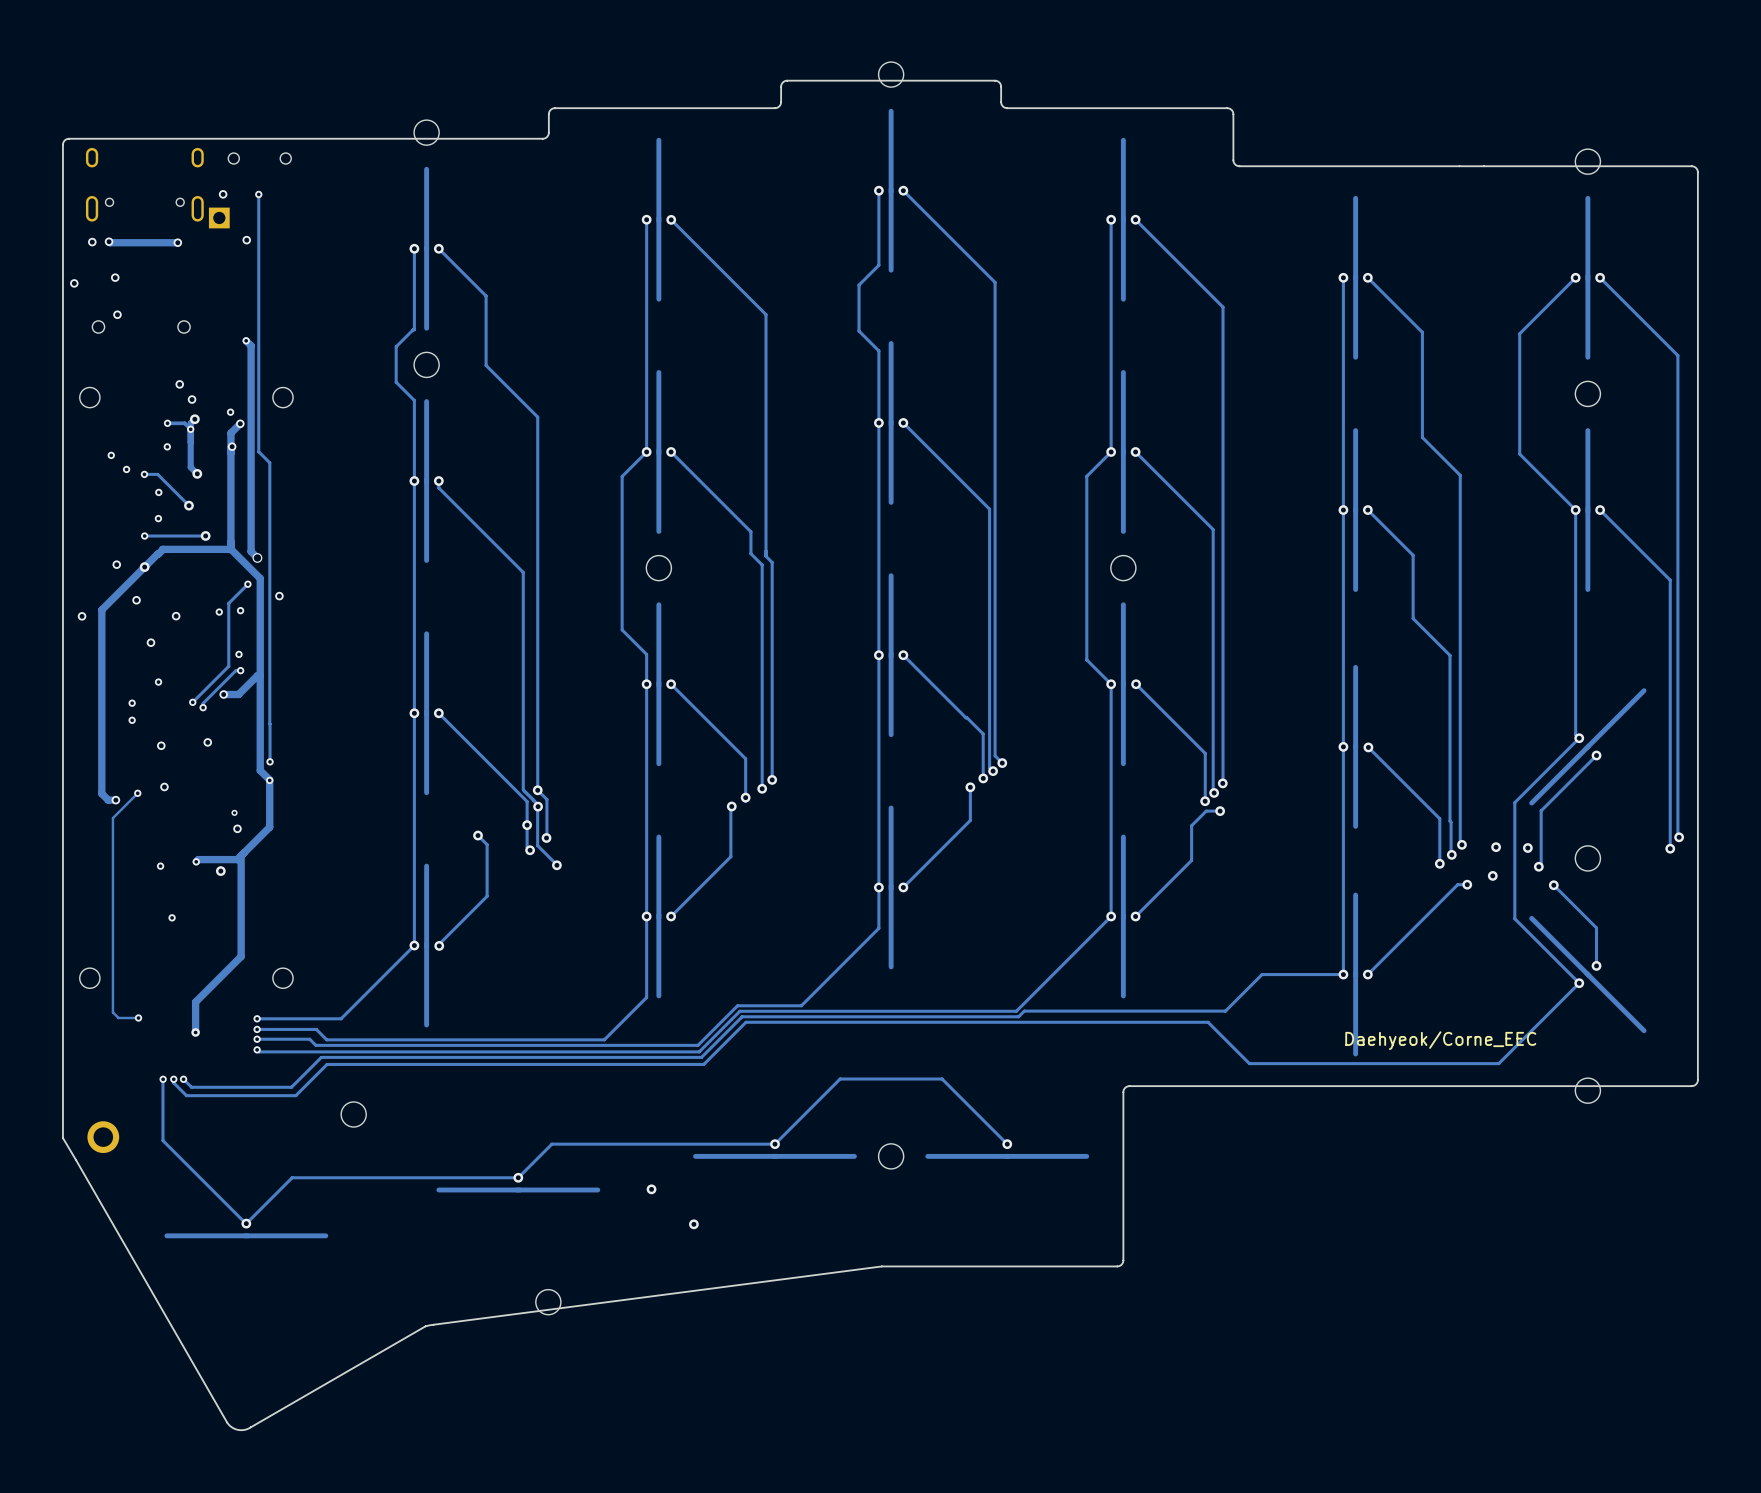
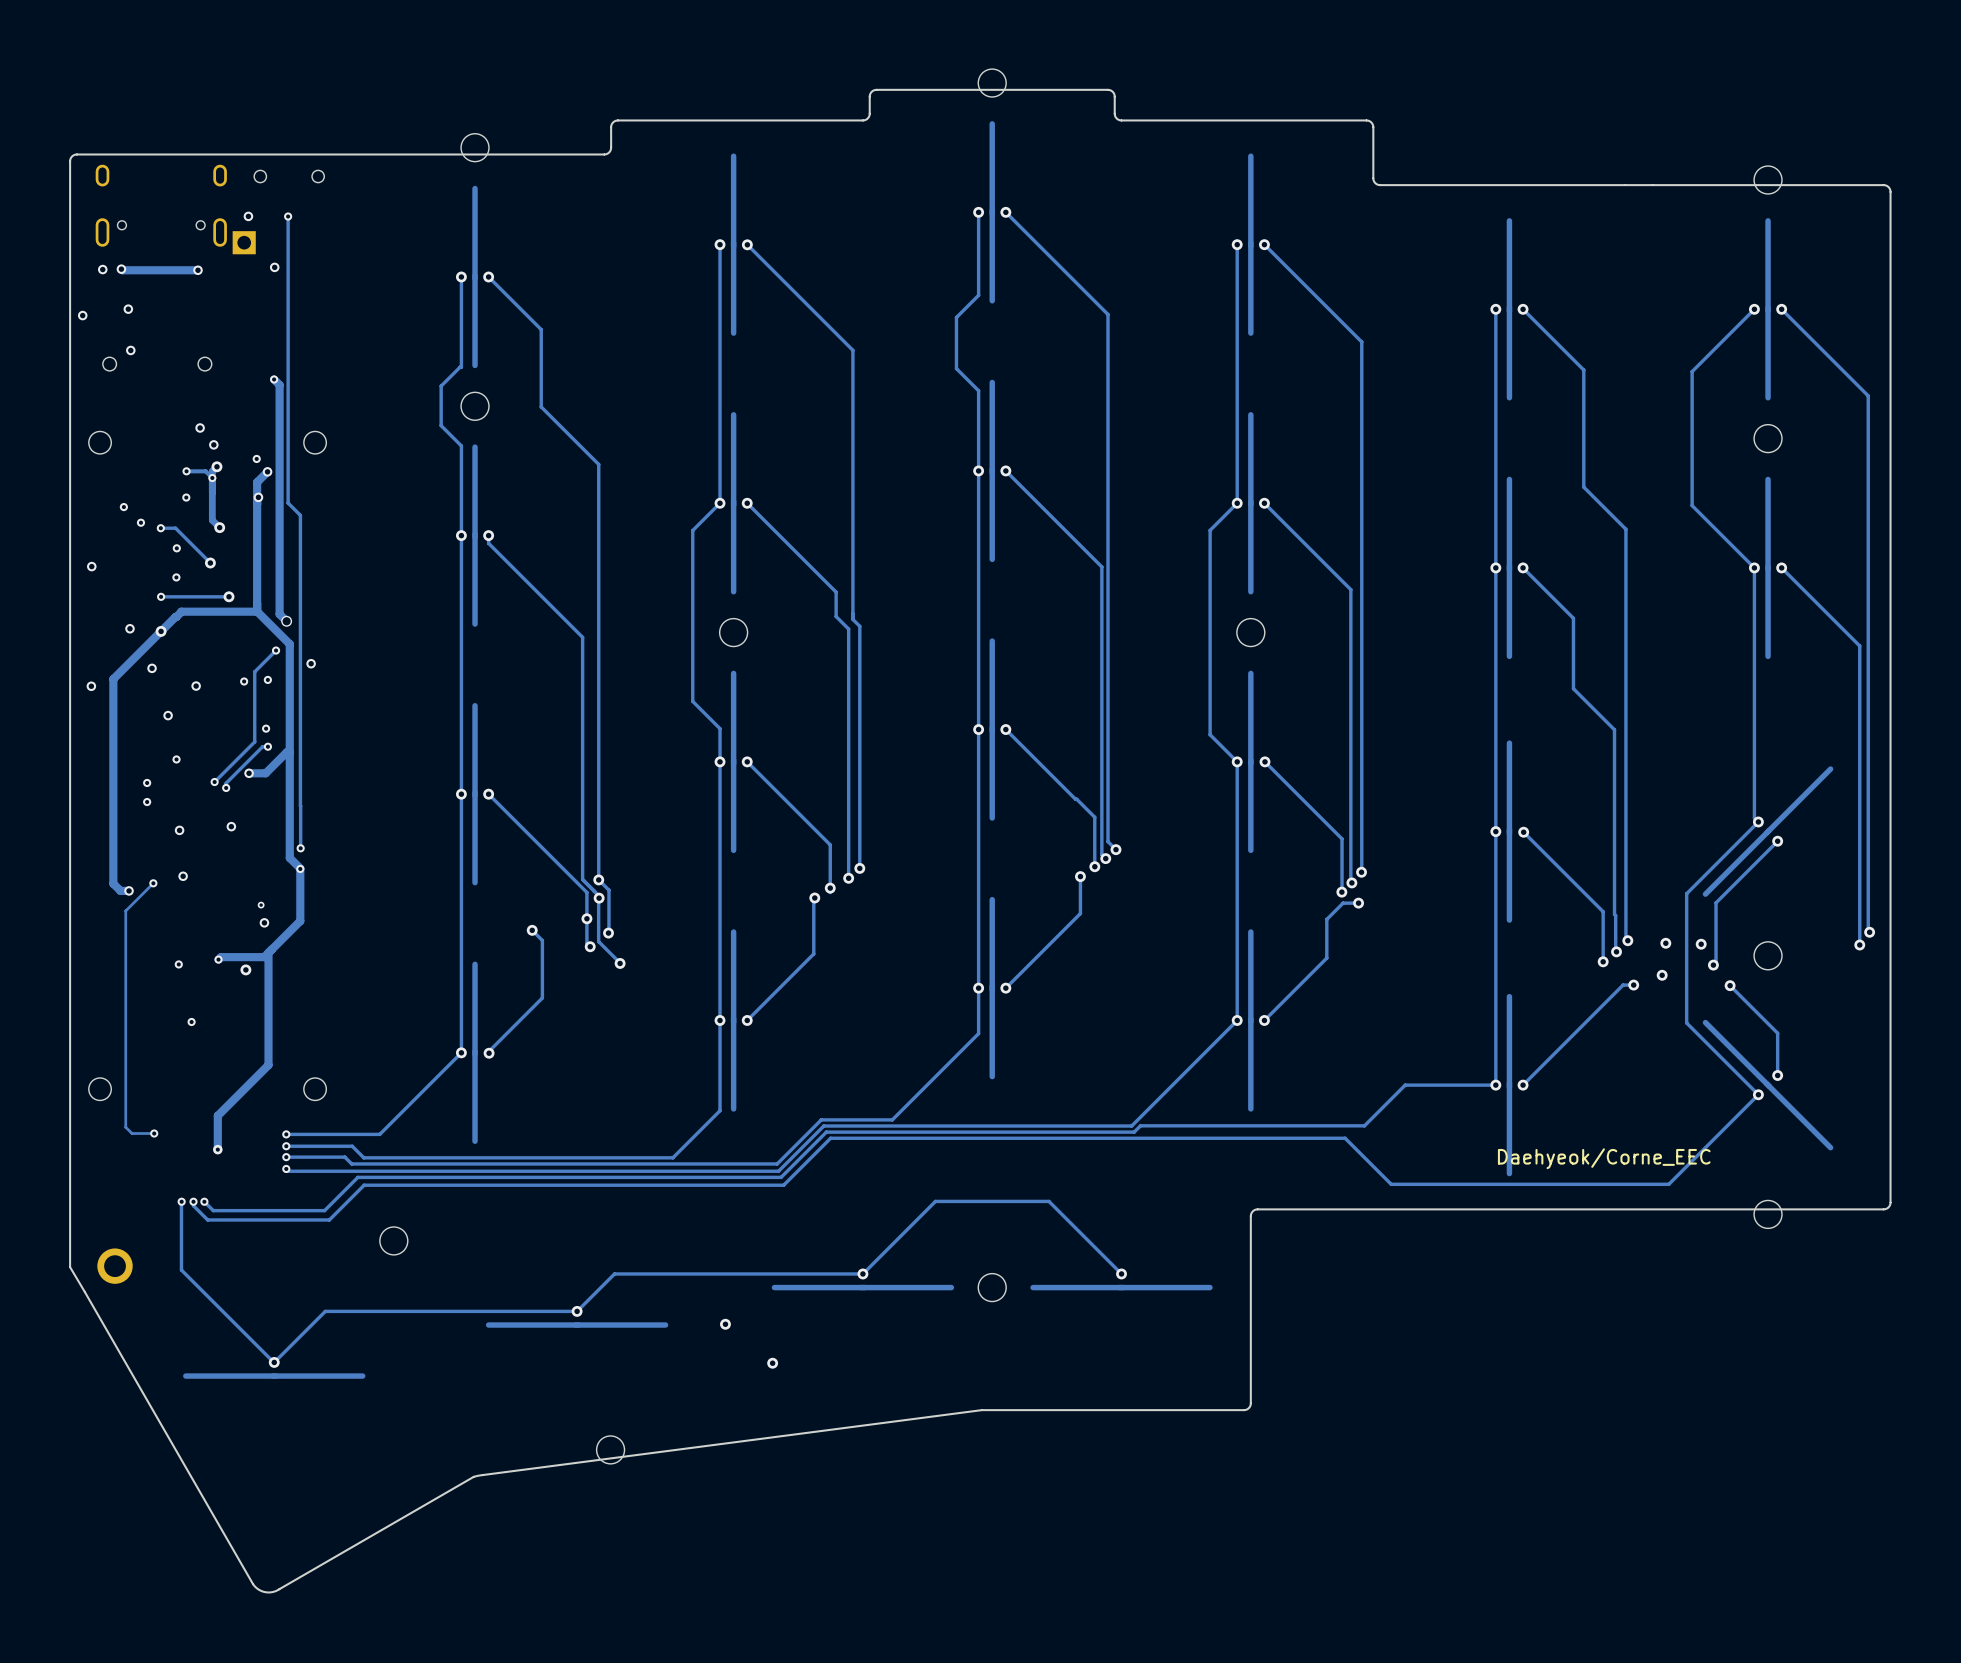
via: none -> (91, 566)

